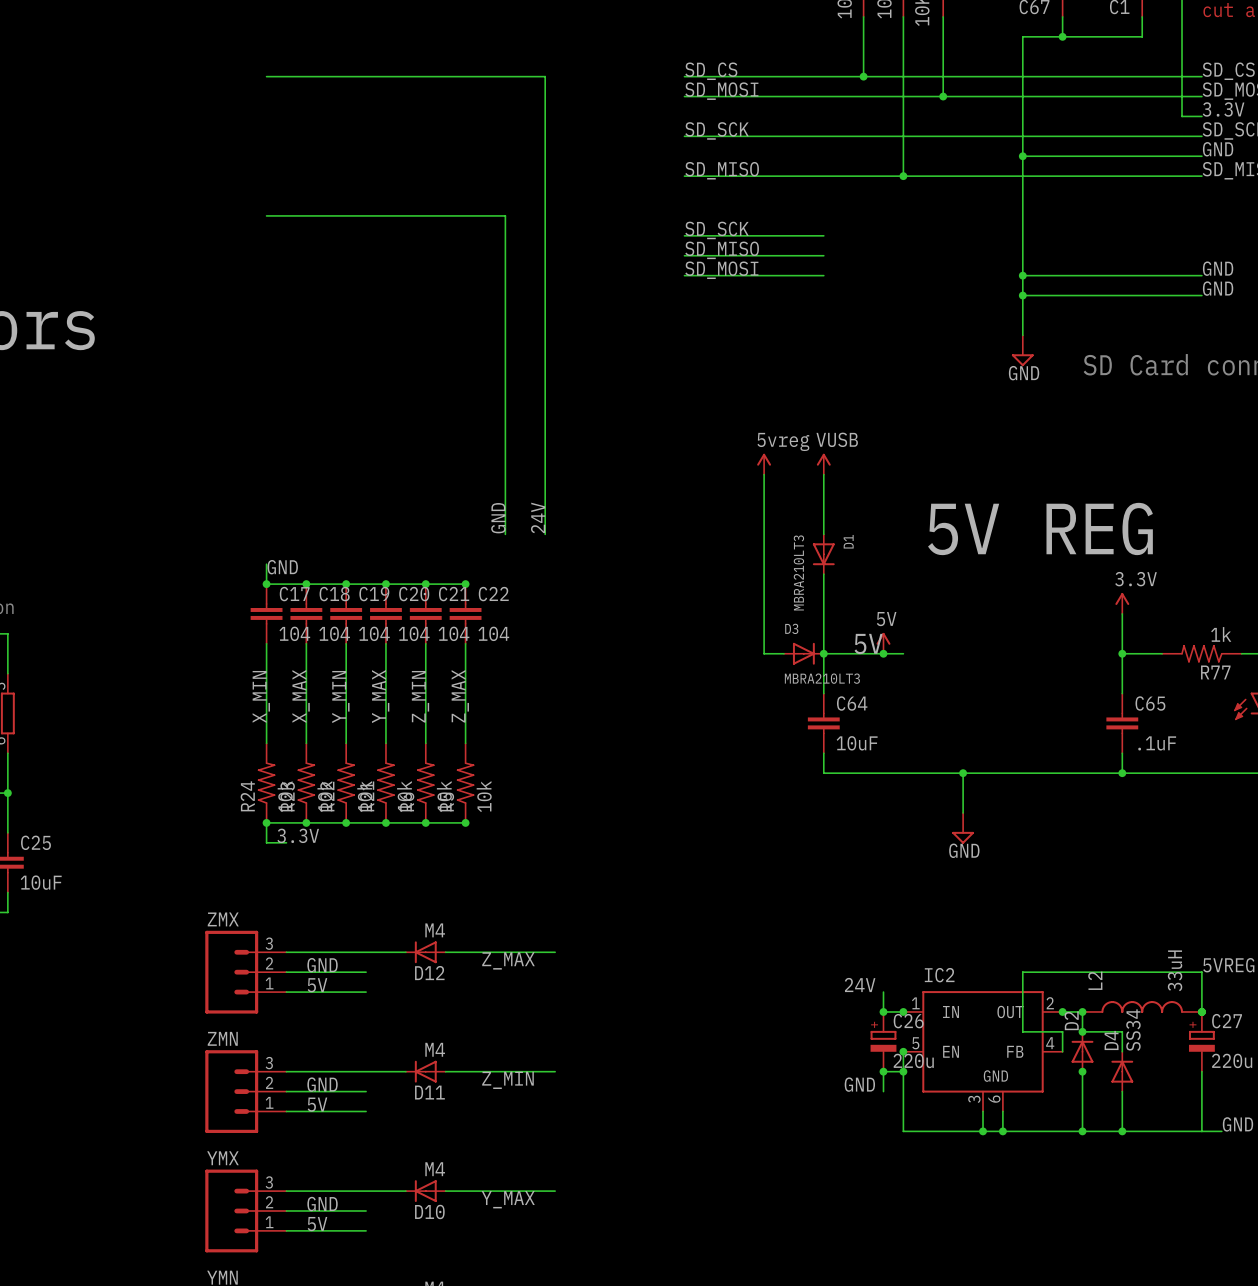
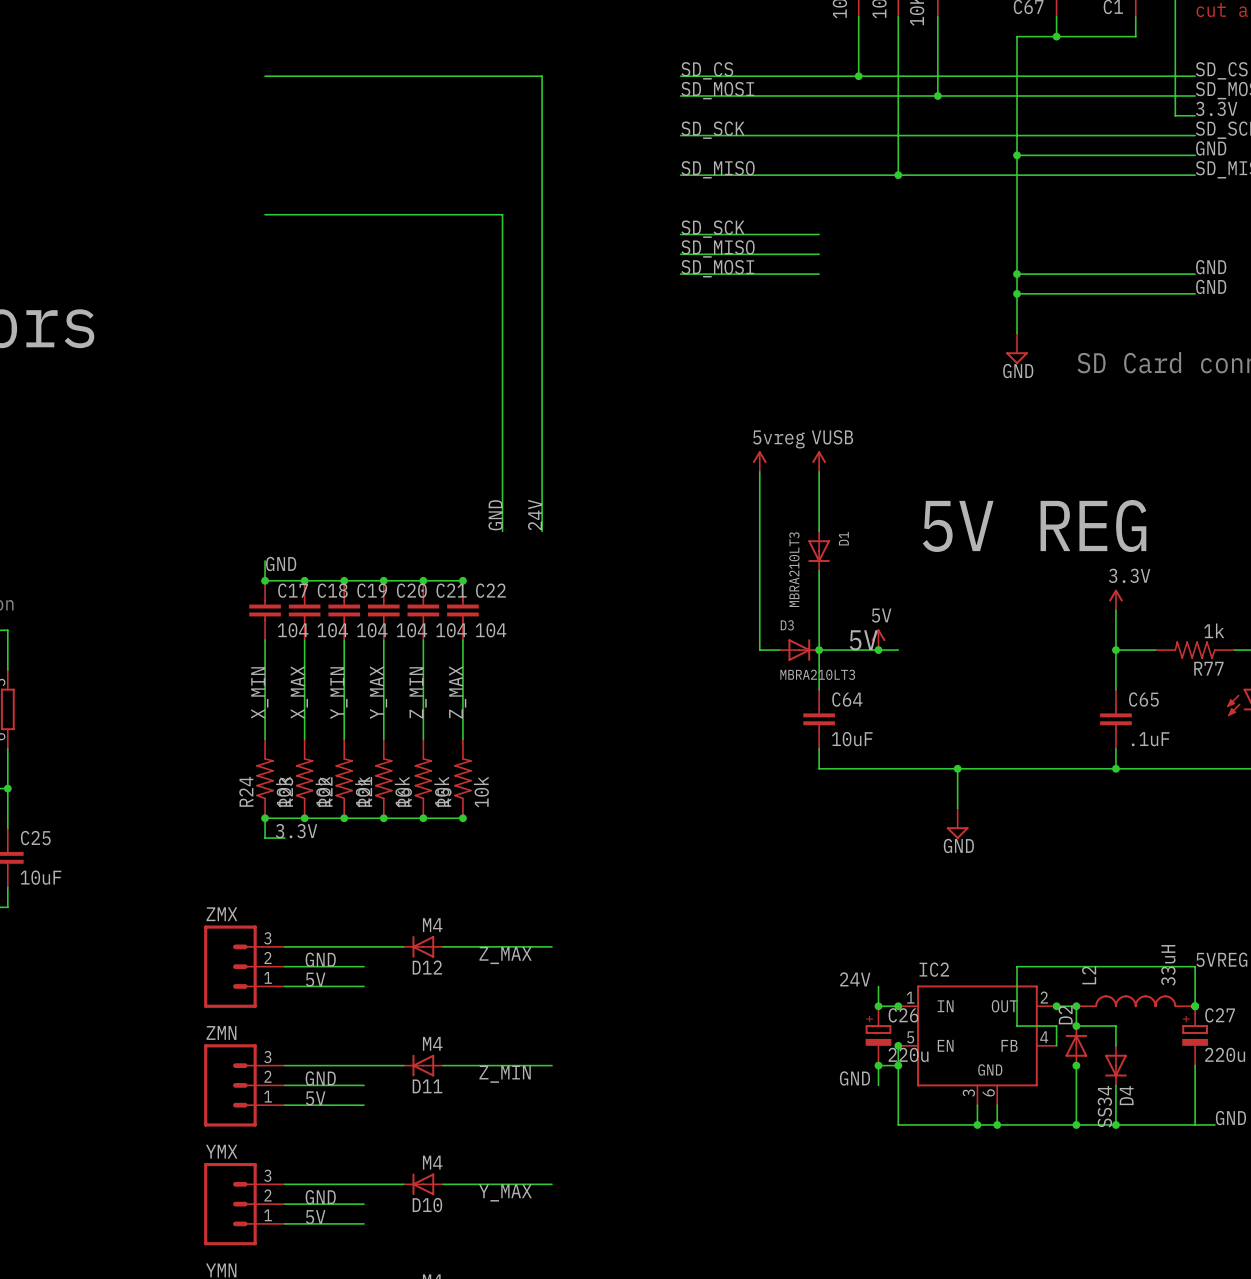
D4 rotation: 0° (1122, 1071) -> 180° (1115, 1065)

